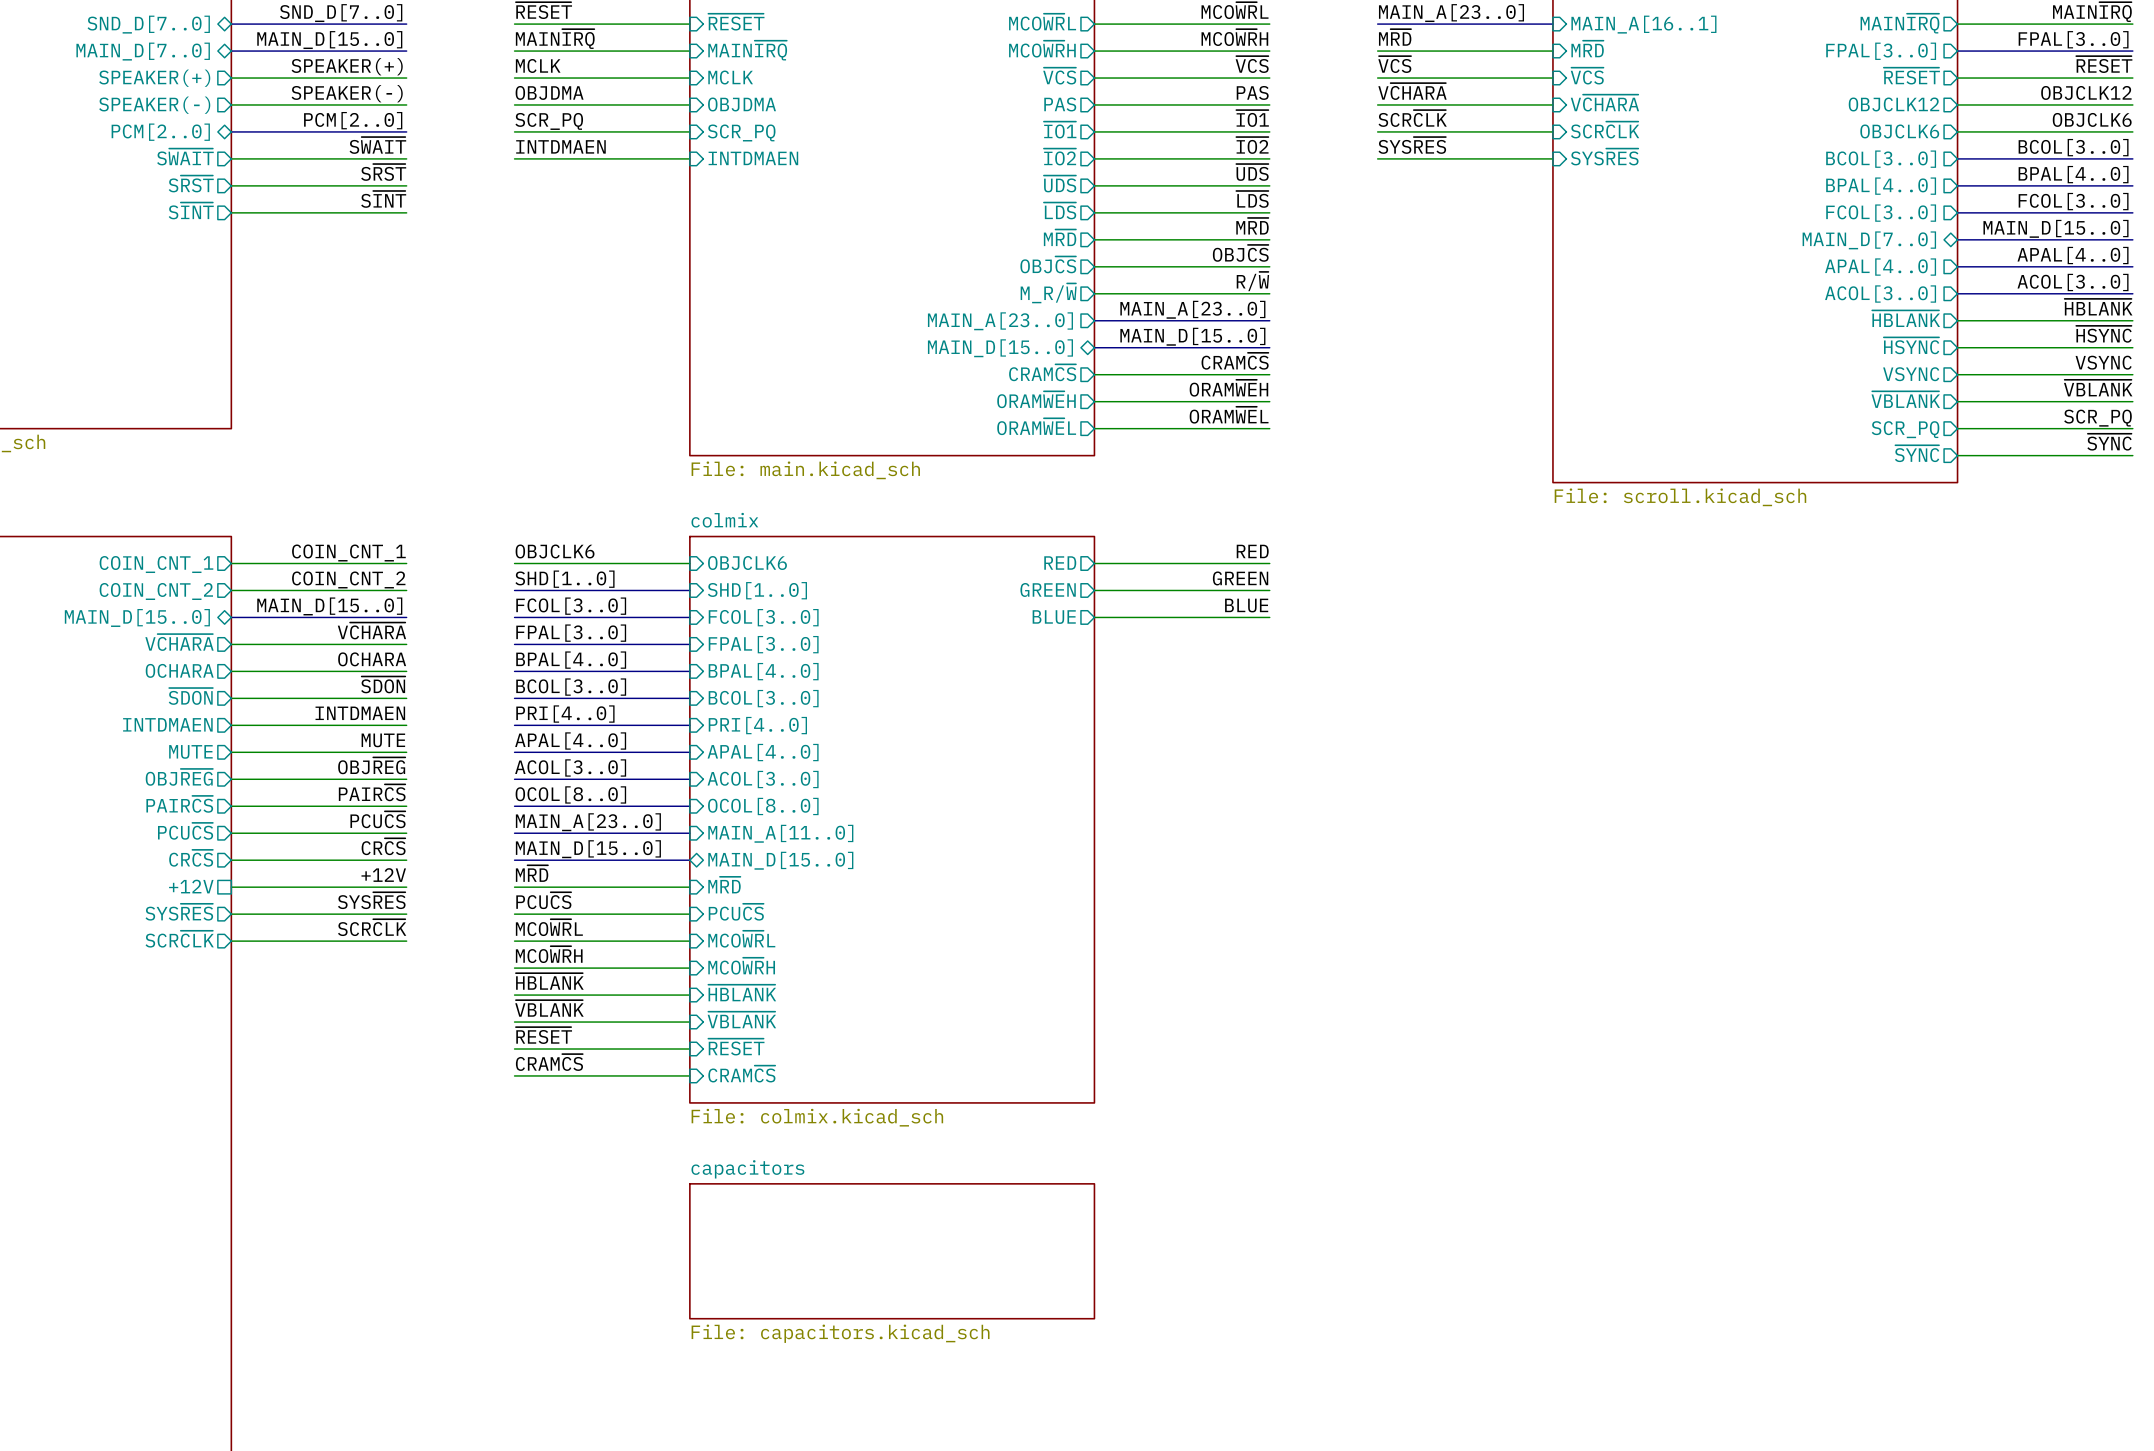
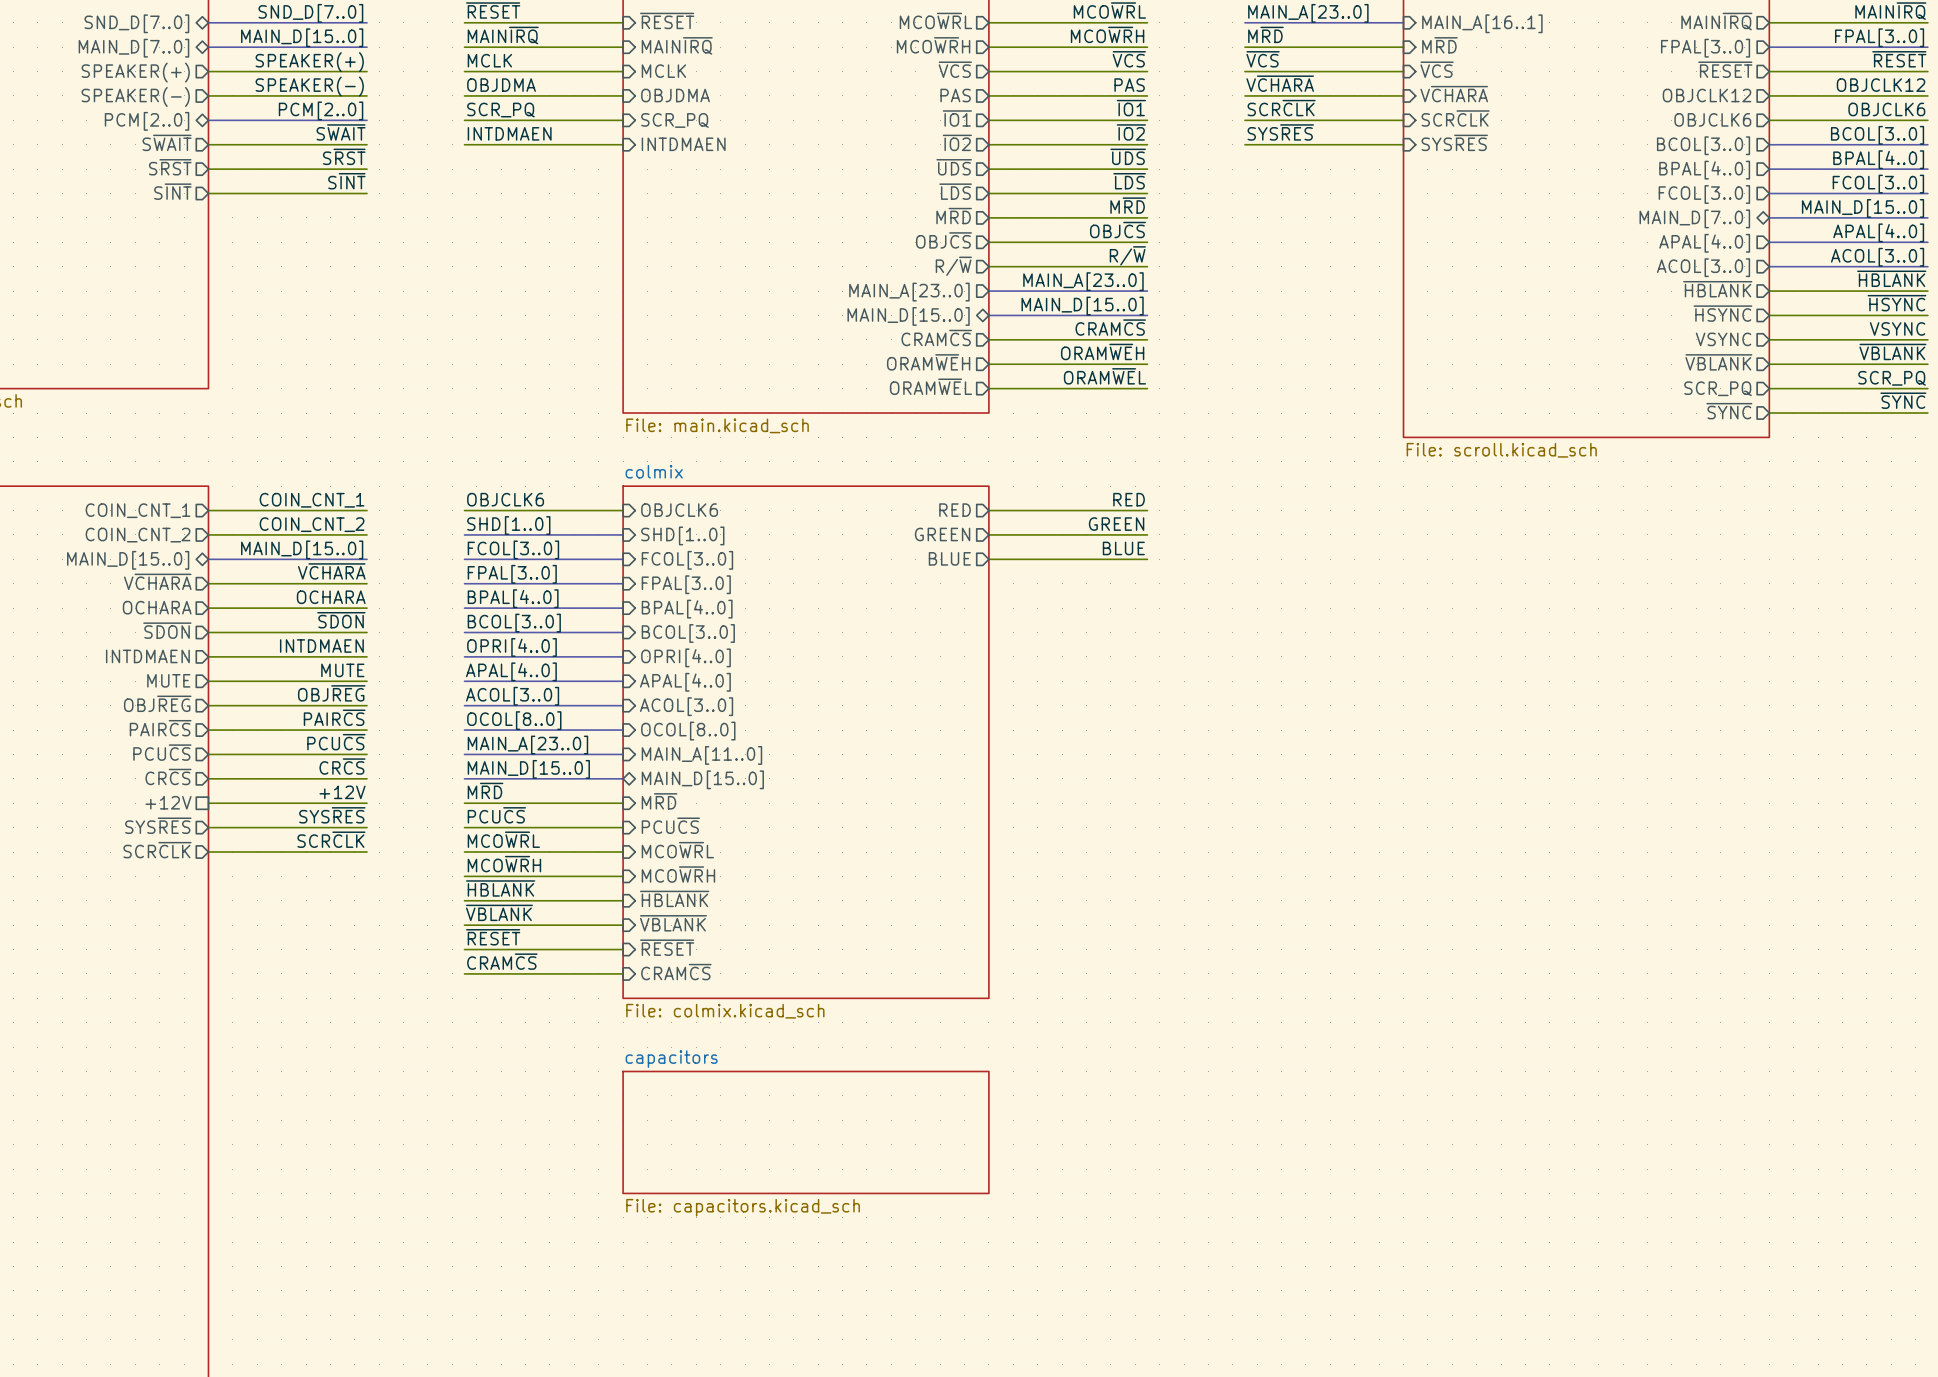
sheet pin: M_R/~{W} (1048, 293) -> R/~{W} (953, 266)
label: PRI[4..0] (565, 714) -> OPRI[4..0] (511, 647)
sheet pin: PRI[4..0] (757, 725) -> OPRI[4..0] (685, 657)

